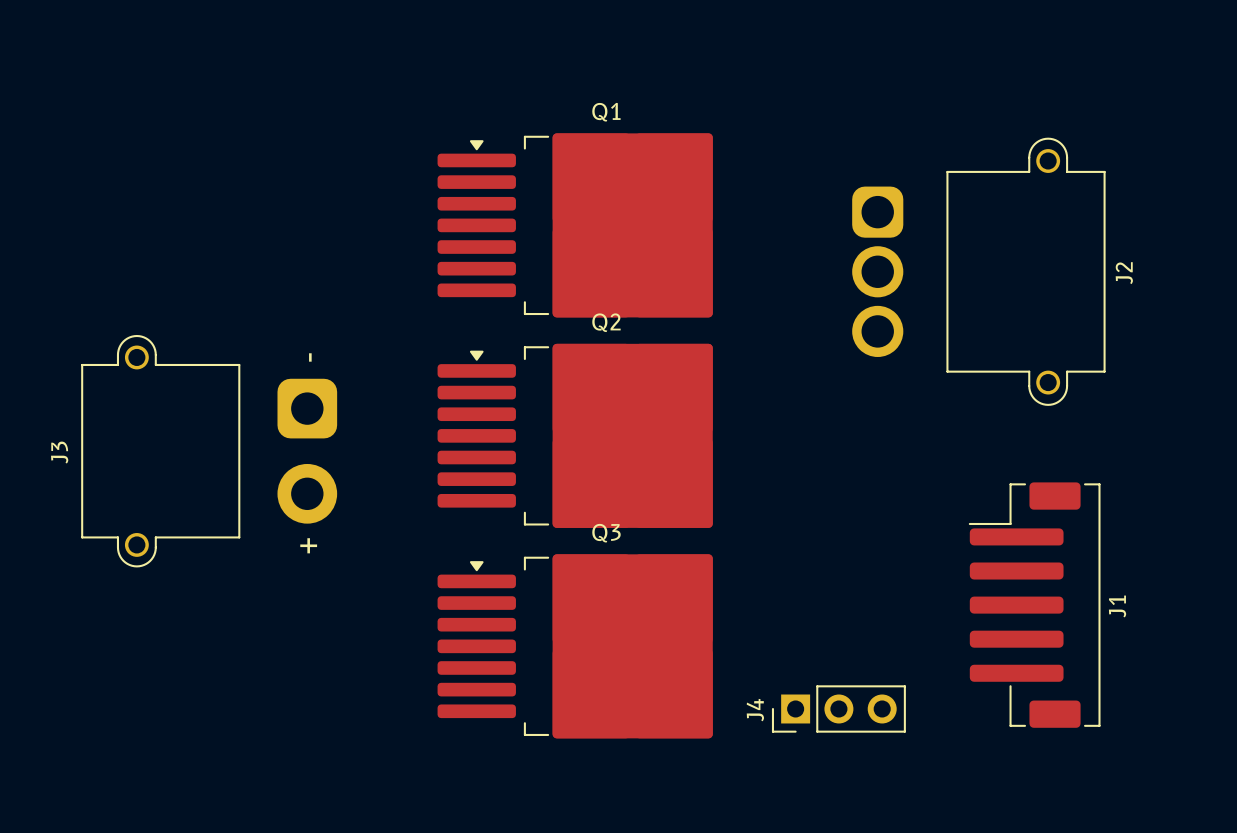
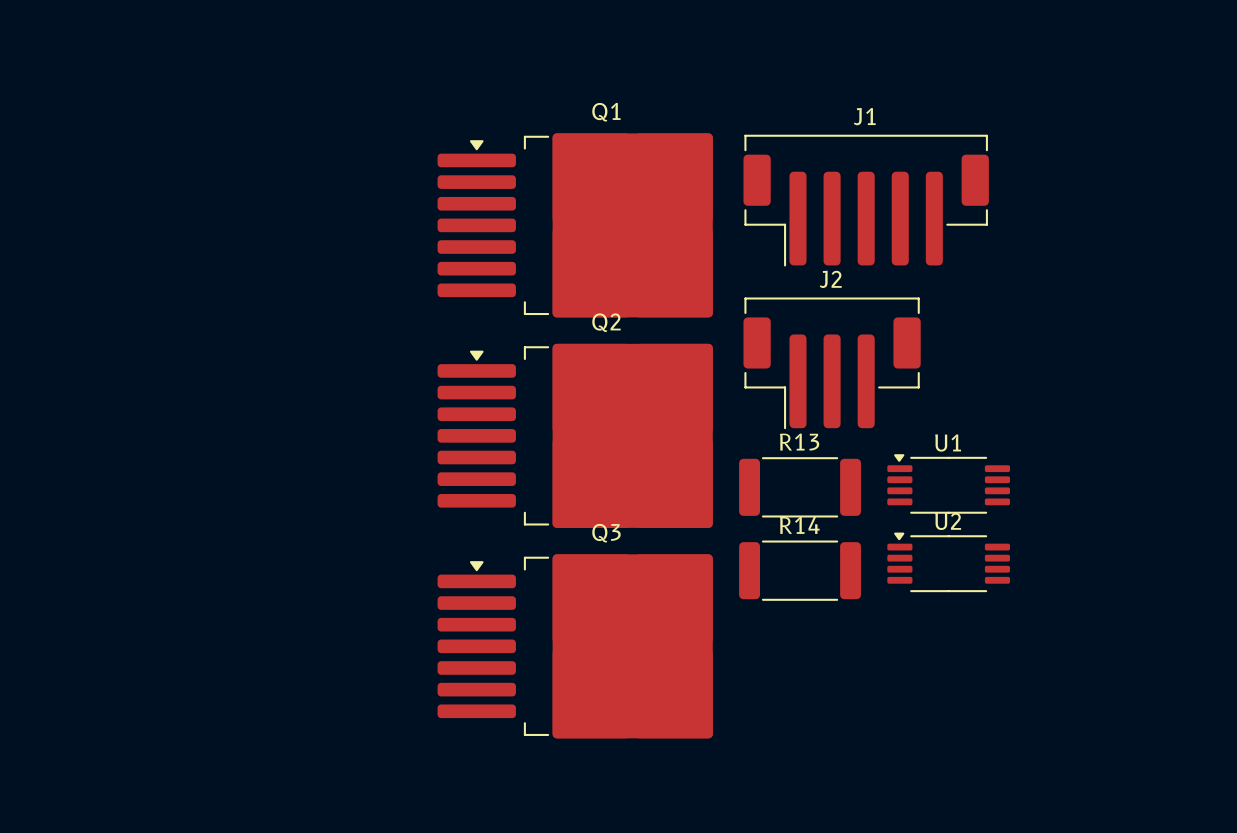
J2 footprint: [852, 137, 1106, 406] -> [743, 297, 921, 430]
J2 name position: J2 (1124, 273) -> J2 (830, 279)
J3: (209, 451) -> none
U1: none -> (948, 483)
R13: none -> (800, 487)
U2: none -> (948, 562)
R14: none -> (800, 570)
J1 rotation: 0° (1034, 605) -> 90° counterclockwise (866, 200)
J1 position: (1034, 605) -> (866, 200)
J4: (838, 708) -> none

